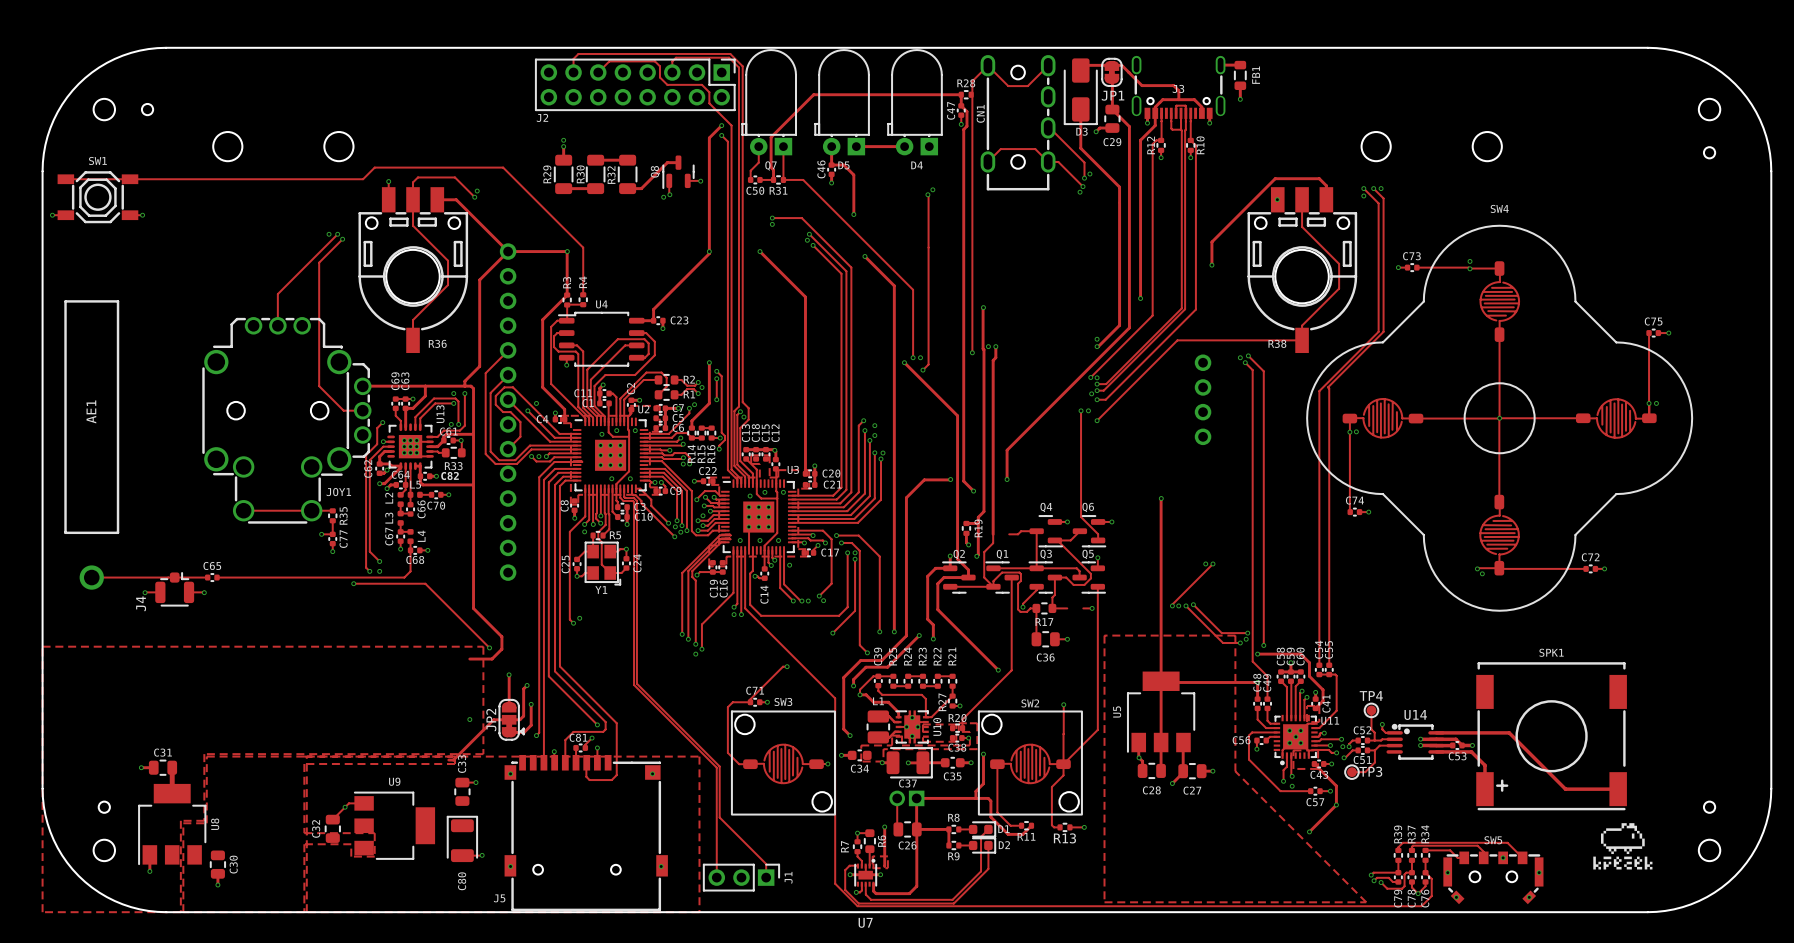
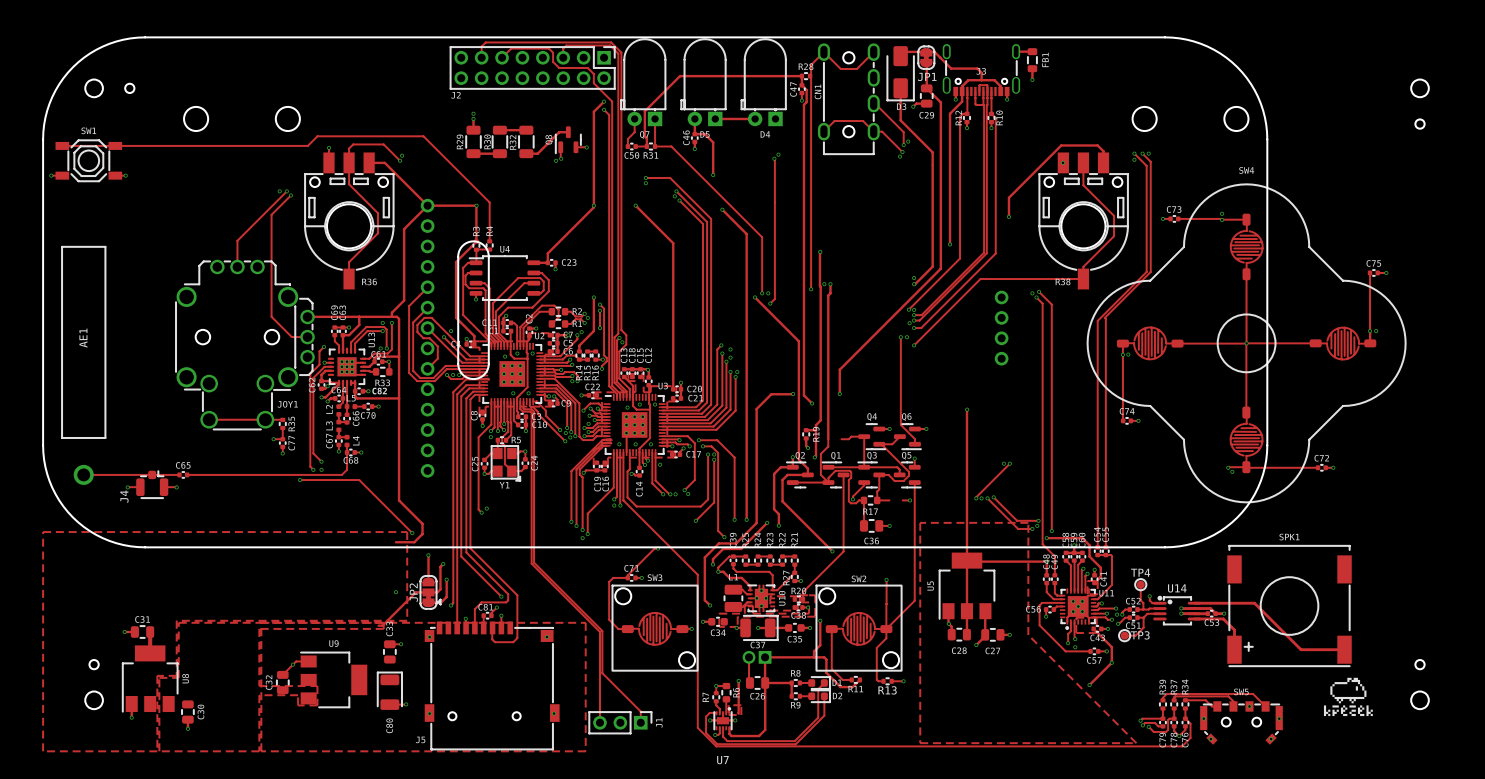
board edge: (1400, 47) (1647, 47) (1674, 50) (1699, 58) (1728, 77) (1751, 104) (1763, 128) (1768, 145) (1771, 171) (1770, 797) (1763, 831) (1746, 862) (1721, 887) (1690, 904) (1665, 910) (1647, 912) (166, 912) (139, 909) (114, 901) (85, 882) (62, 855) (47, 823) (42, 788) (42, 541) -> (1165, 37) (1186, 39) (1200, 43) (1220, 53) (1237, 67) (1251, 84) (1258, 96) (1263, 110) (1267, 132) (1266, 459) (1258, 487) (1246, 506) (1226, 527) (1200, 540) (1186, 545) (1165, 547) (137, 547) (116, 543) (102, 538) (89, 531) (72, 517) (59, 500) (52, 487) (45, 467) (43, 445)
drawing: none -> [458, 241, 490, 380]

